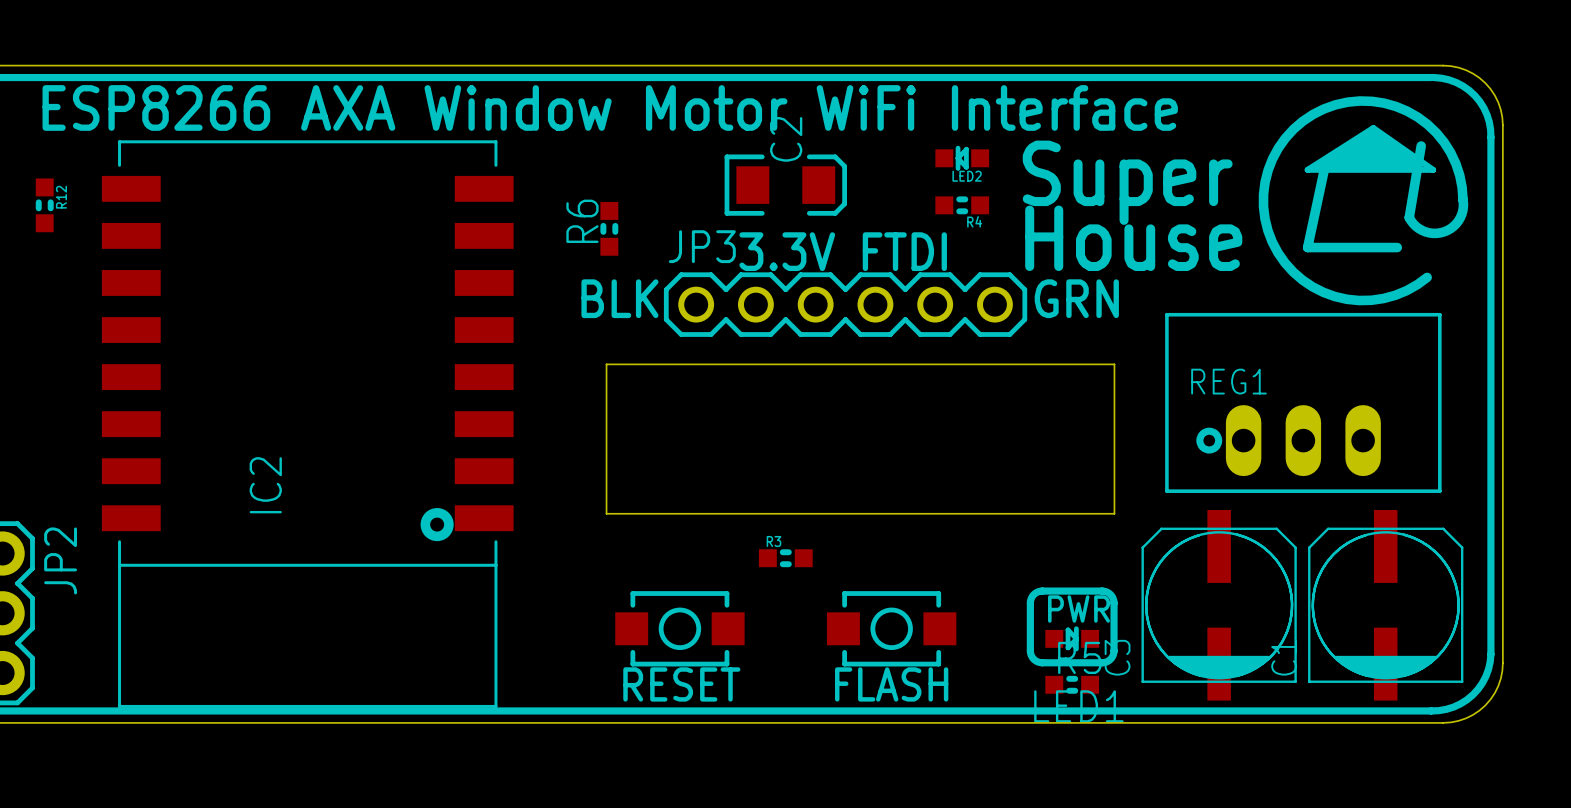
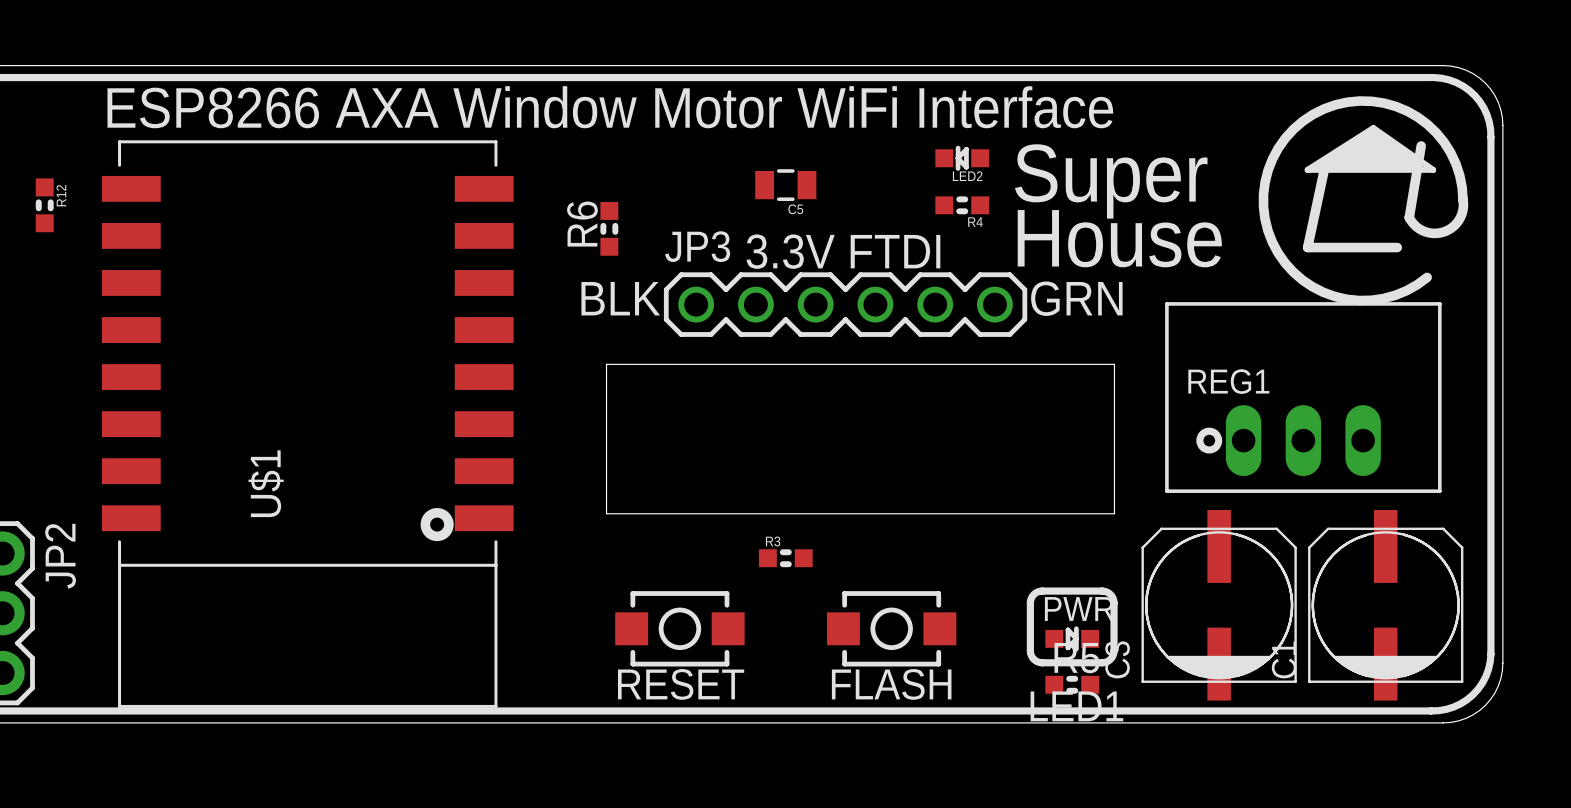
C2: (785, 185) -> none
C5: none -> (785, 185)
REG1 footprint: [1165, 312, 1442, 493] -> [1165, 302, 1442, 493]
IC2 name: IC2 (265, 485) -> U$1 (266, 483)

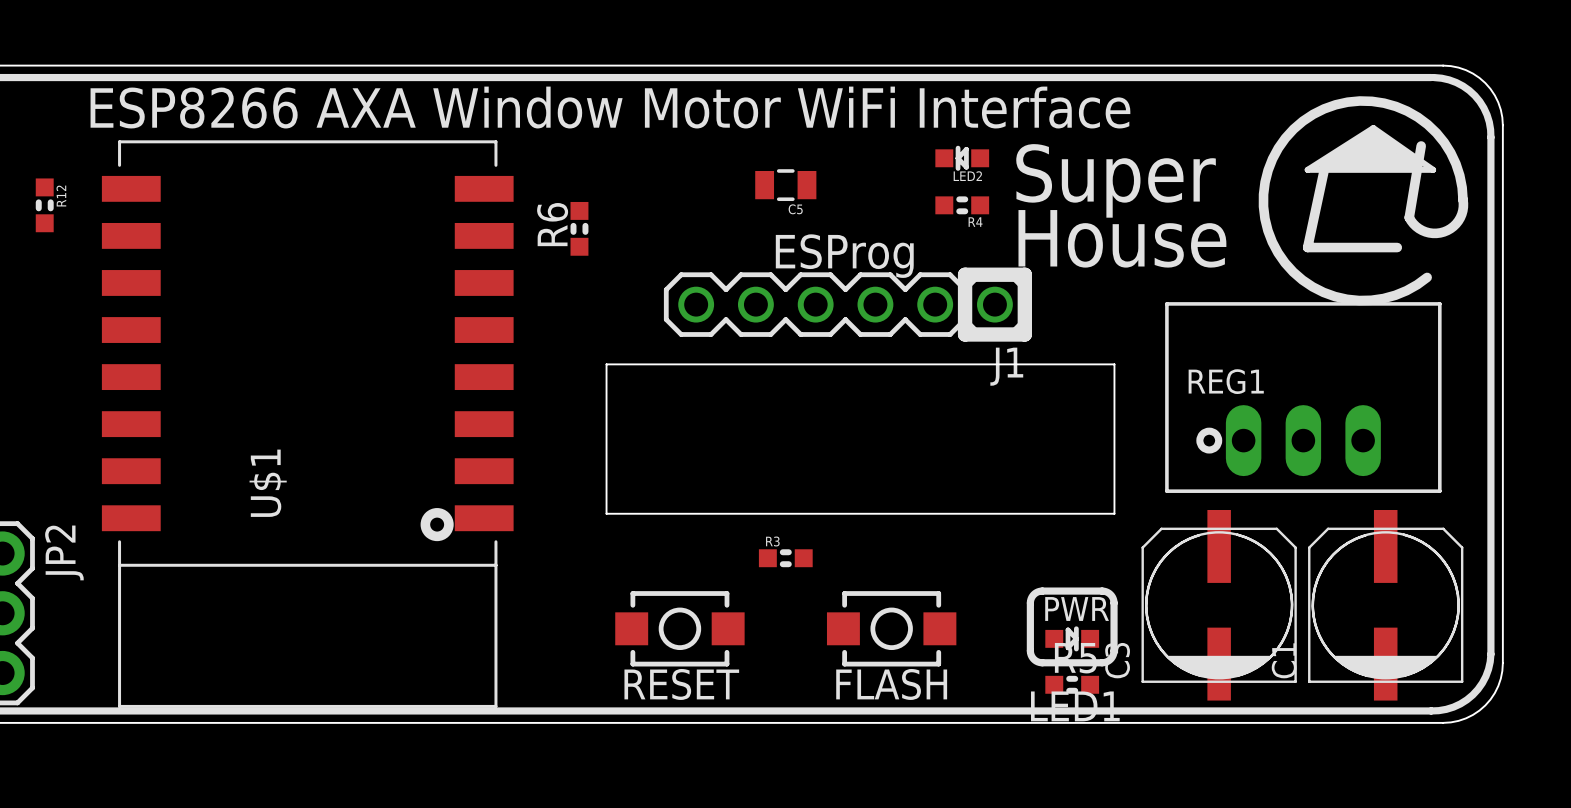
R6 position: (609, 228) -> (579, 228)
text: 3.3V FTDI (843, 251) -> ESProg (844, 256)
text: BLK (620, 298) -> none
text: GRN (1076, 298) -> none
JP3: (845, 304) -> none
J1: none -> (847, 304)

